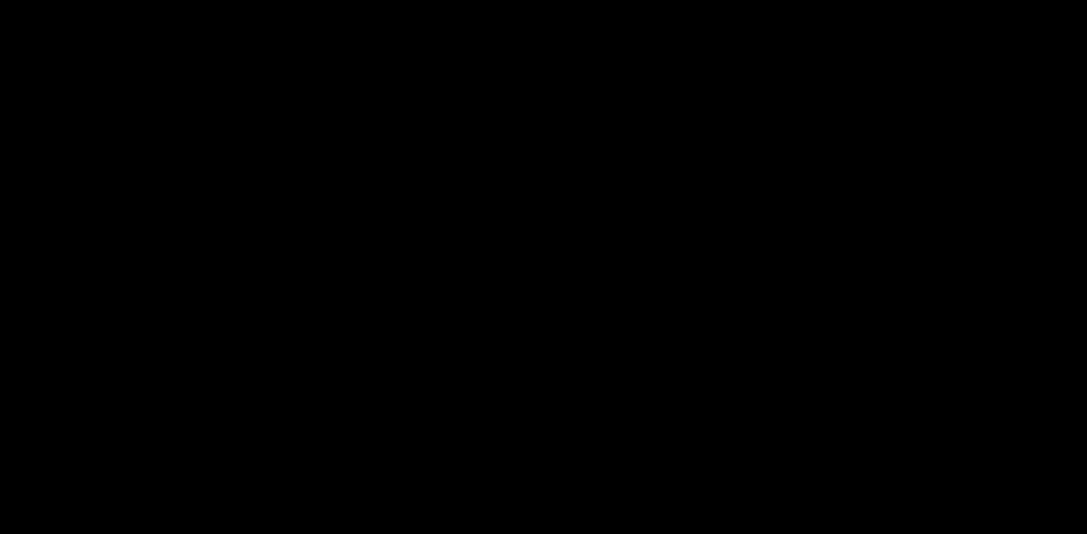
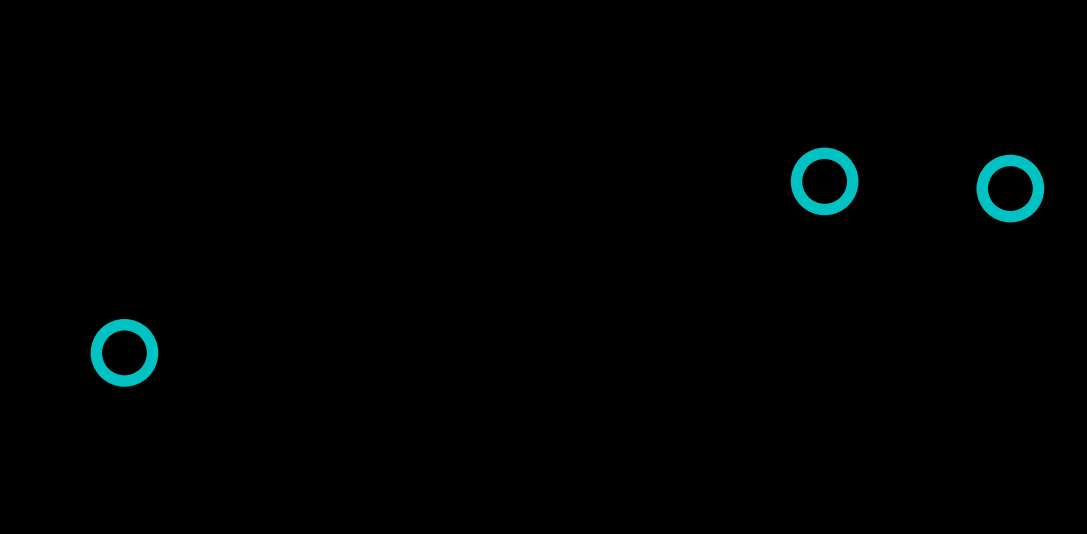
drawing: none -> [790, 147, 859, 216]
drawing: none -> [976, 154, 1045, 223]
drawing: none -> [90, 319, 159, 387]

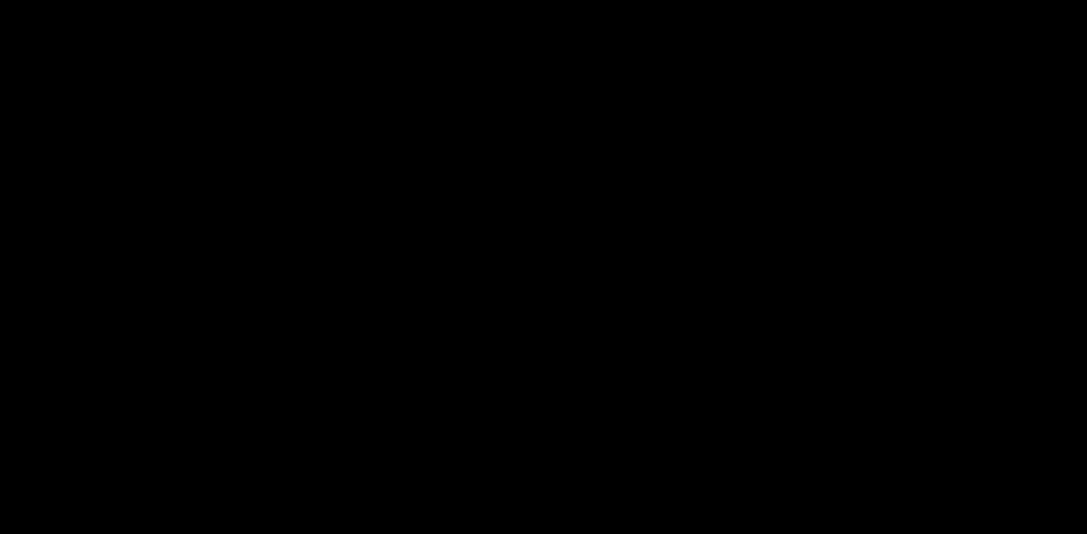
drawing: [790, 147, 859, 216] -> none
drawing: [976, 154, 1045, 223] -> none
drawing: [90, 319, 159, 387] -> none

